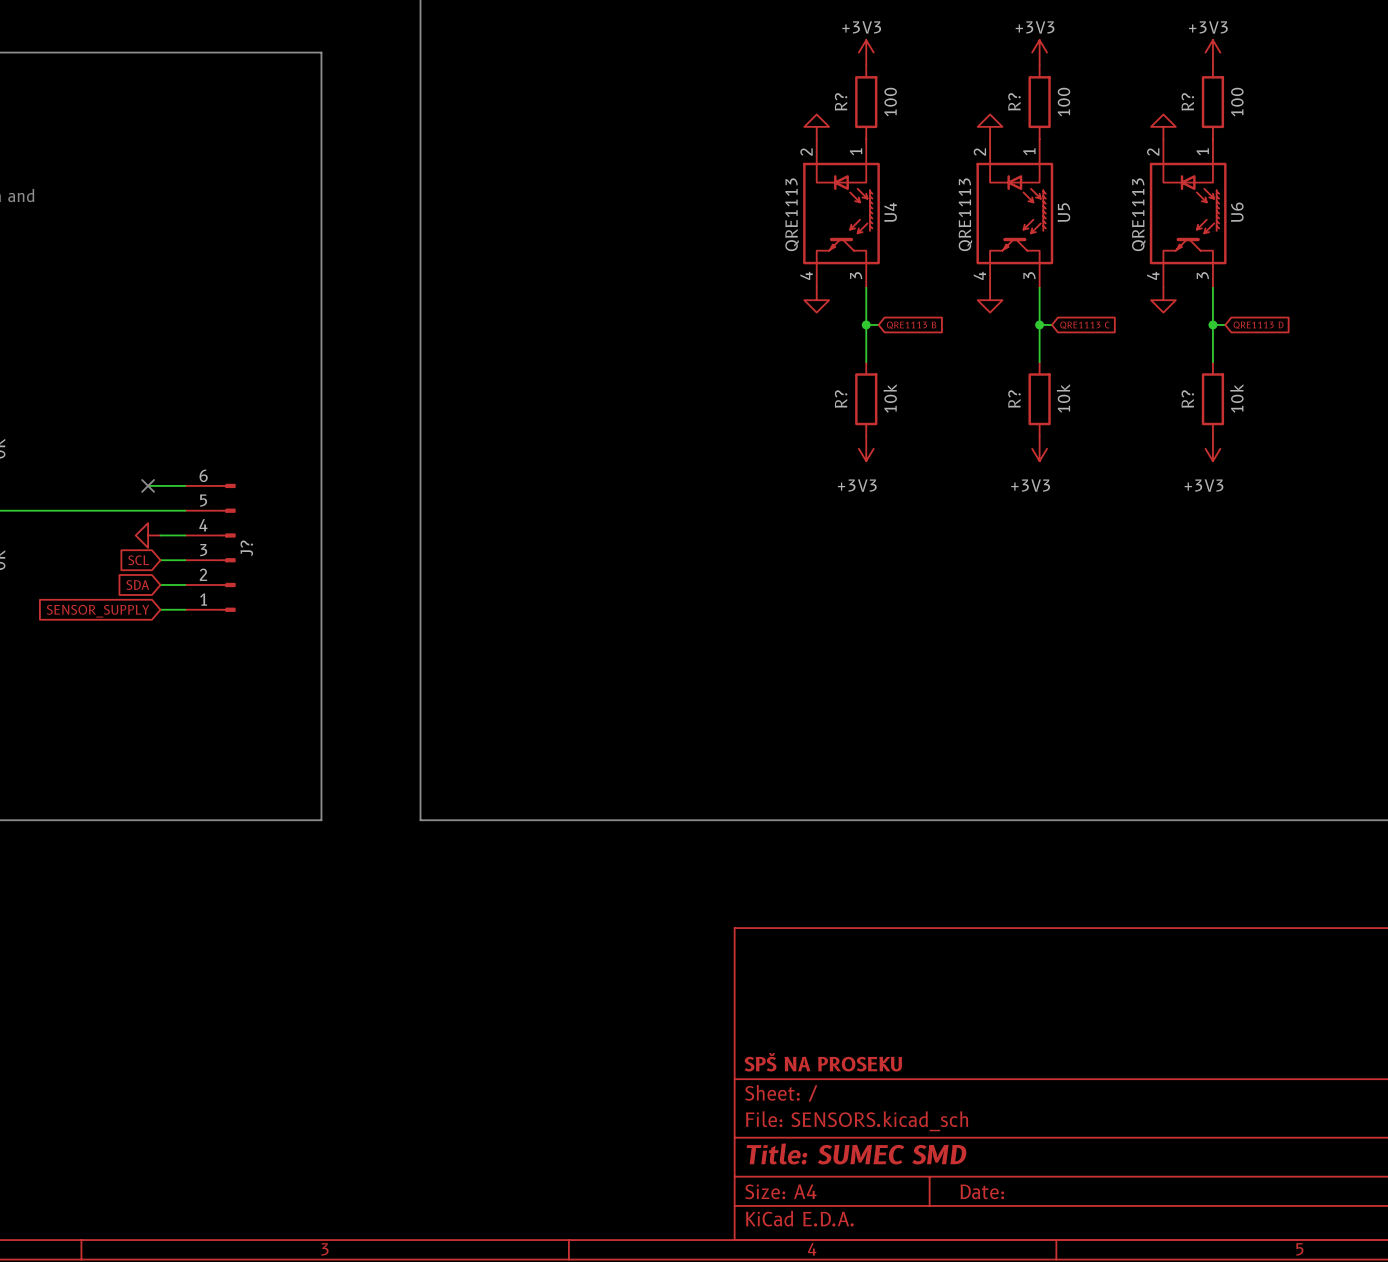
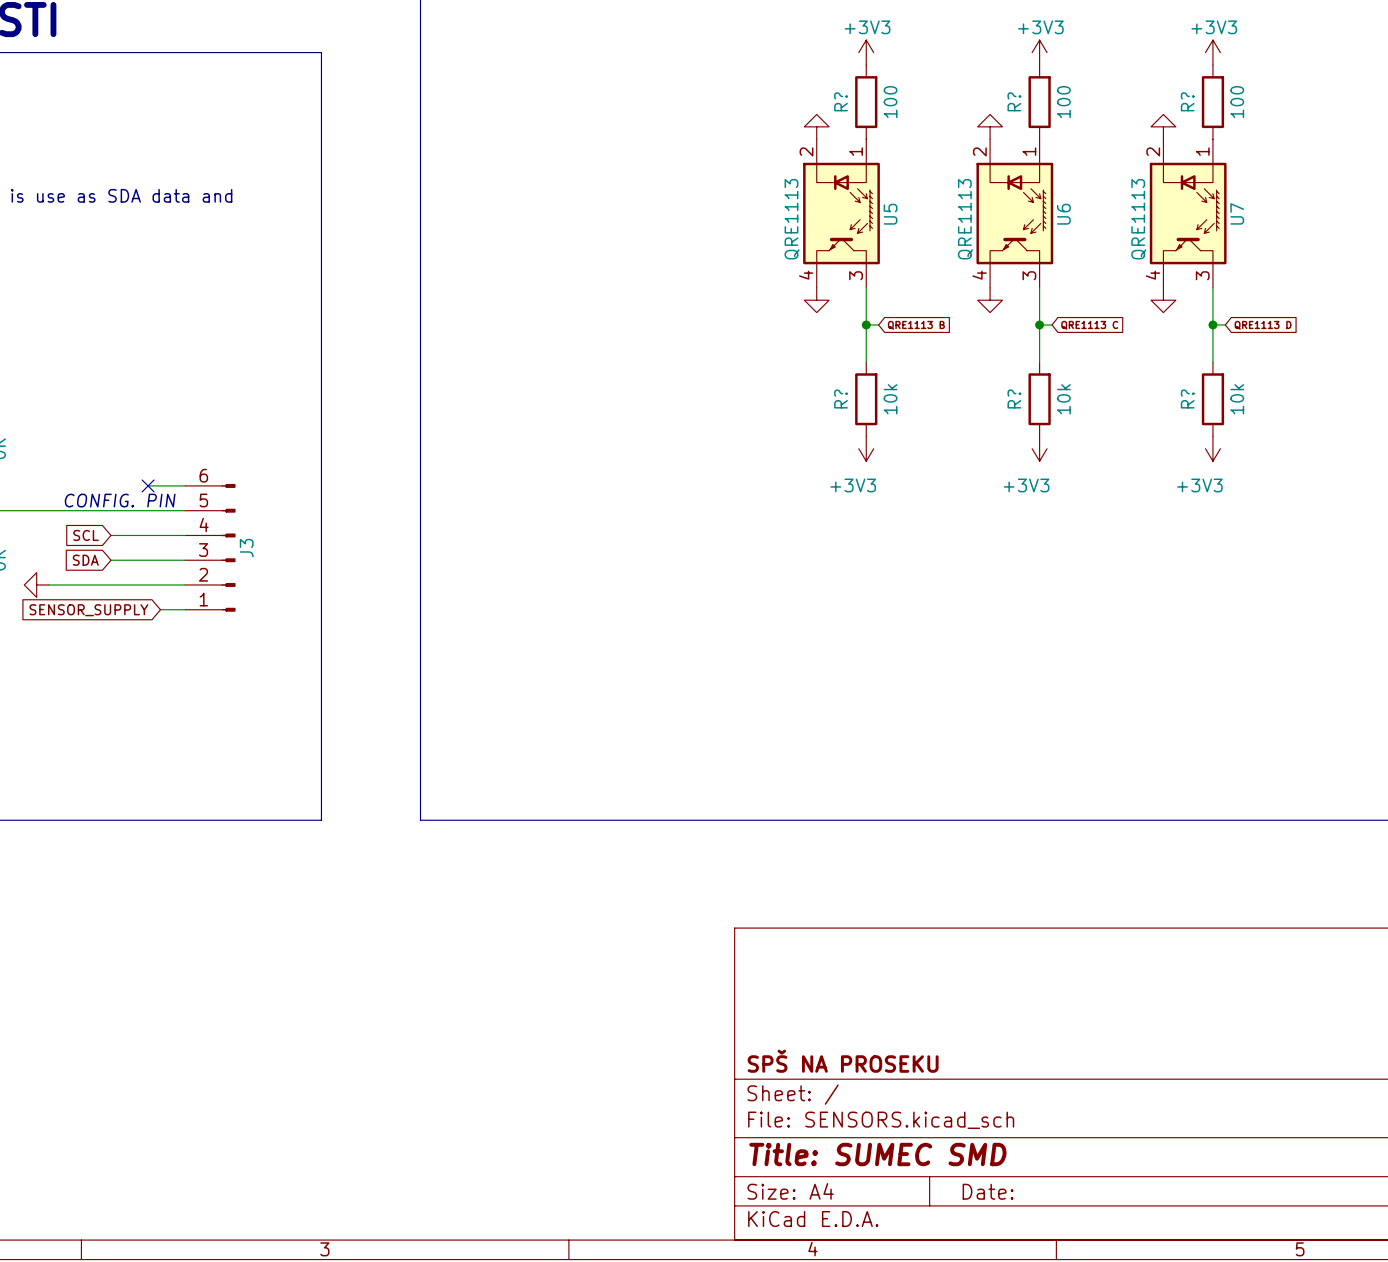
U4 name: U4 (890, 212) -> U5 (890, 214)
U5 name: U5 (1063, 212) -> U6 (1063, 214)
U6 name: U6 (1237, 212) -> U7 (1237, 213)
text: none -> CONFIG. PIN (120, 500)
wire: none -> (110, 535) (160, 535)
power symbol position: (148, 535) -> (36, 584)
J? name: J? (246, 548) -> J3 (246, 548)
wire: none -> (110, 560) (160, 560)
global label position: SCL (138, 560) -> SCL (86, 535)
wire: none -> (49, 584) (160, 584)
global label position: SDA (137, 585) -> SDA (85, 560)

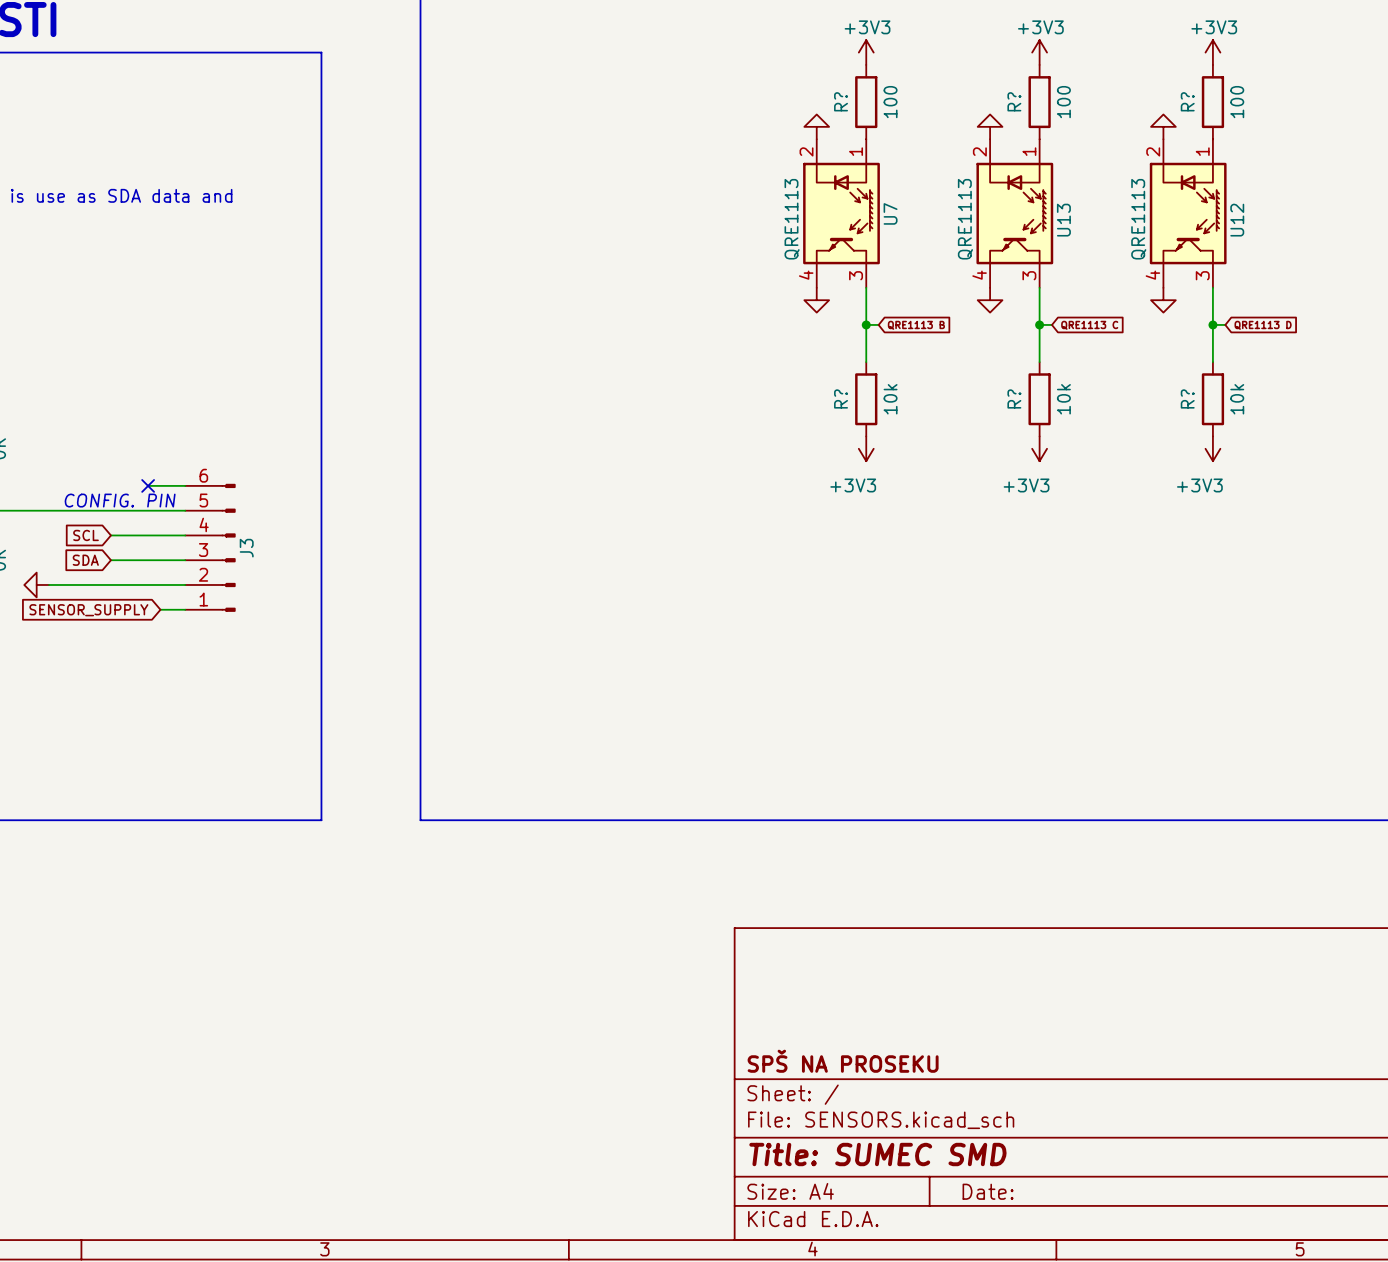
U7 name: U7 (1237, 213) -> U12 (1237, 220)
U5 name: U5 (890, 214) -> U7 (890, 213)
U6 name: U6 (1063, 214) -> U13 (1063, 220)

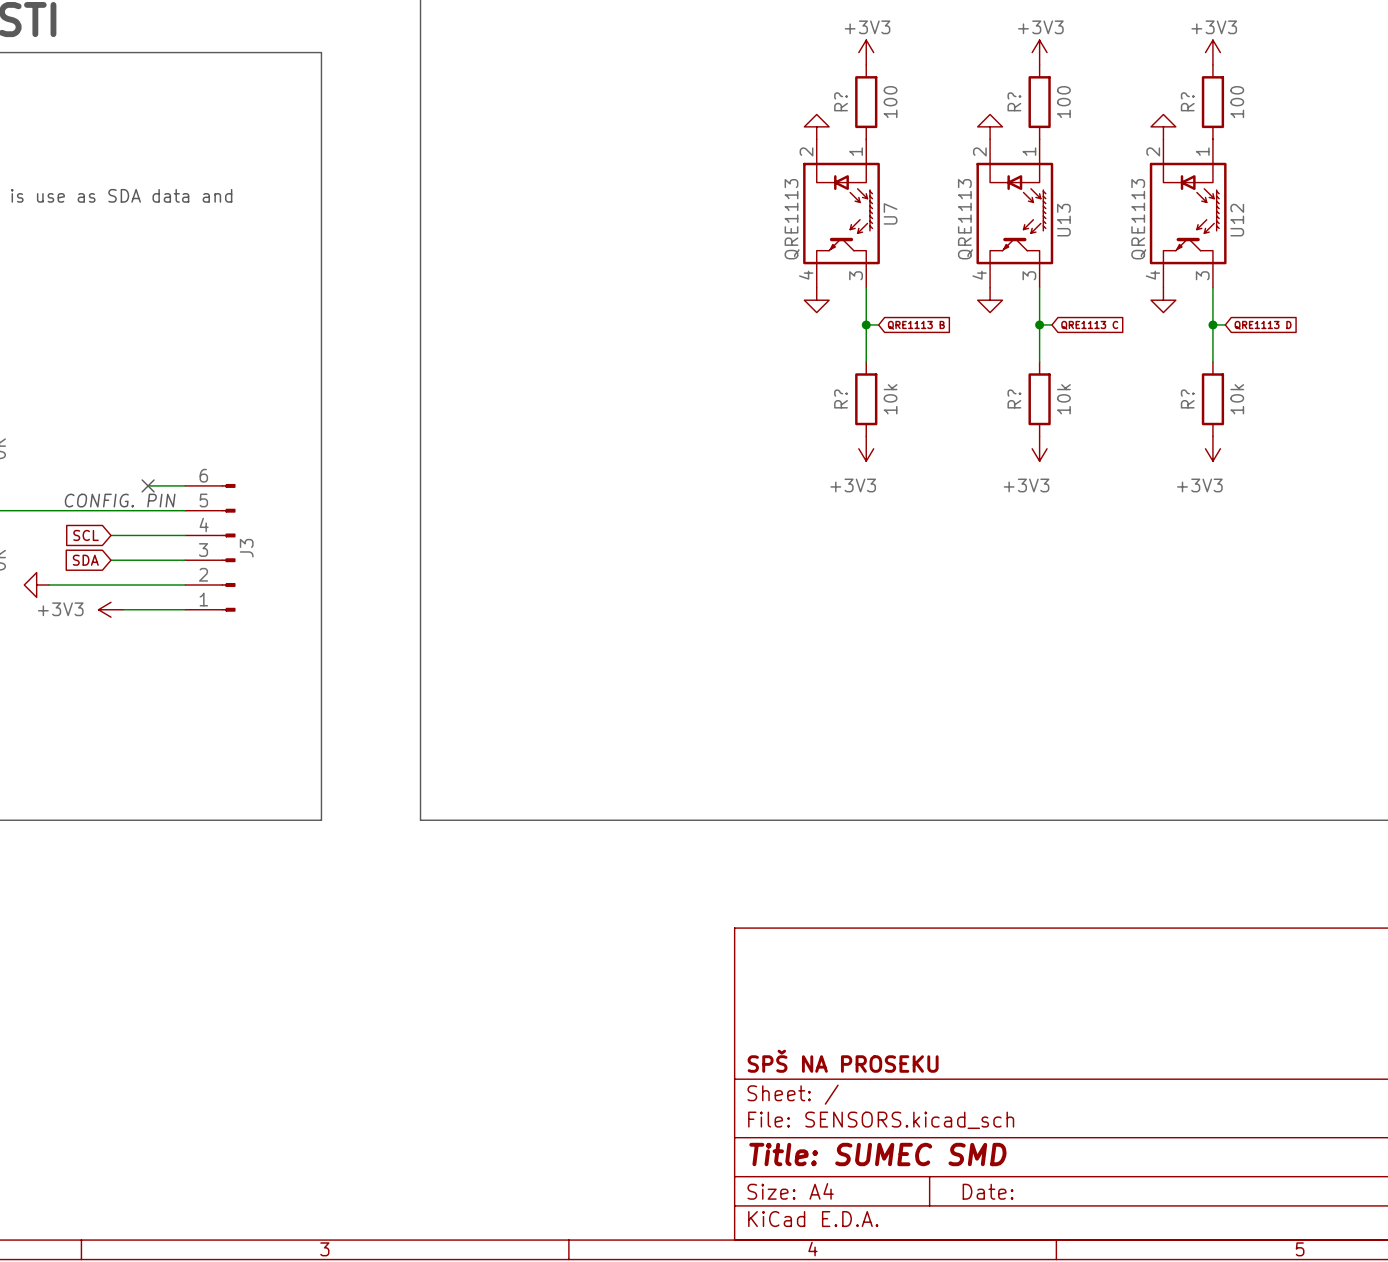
power symbol: none -> +3V3 (110, 609)
wire: none -> (123, 609) (160, 609)
global label: SENSOR_SUPPLY (88, 610) -> none

